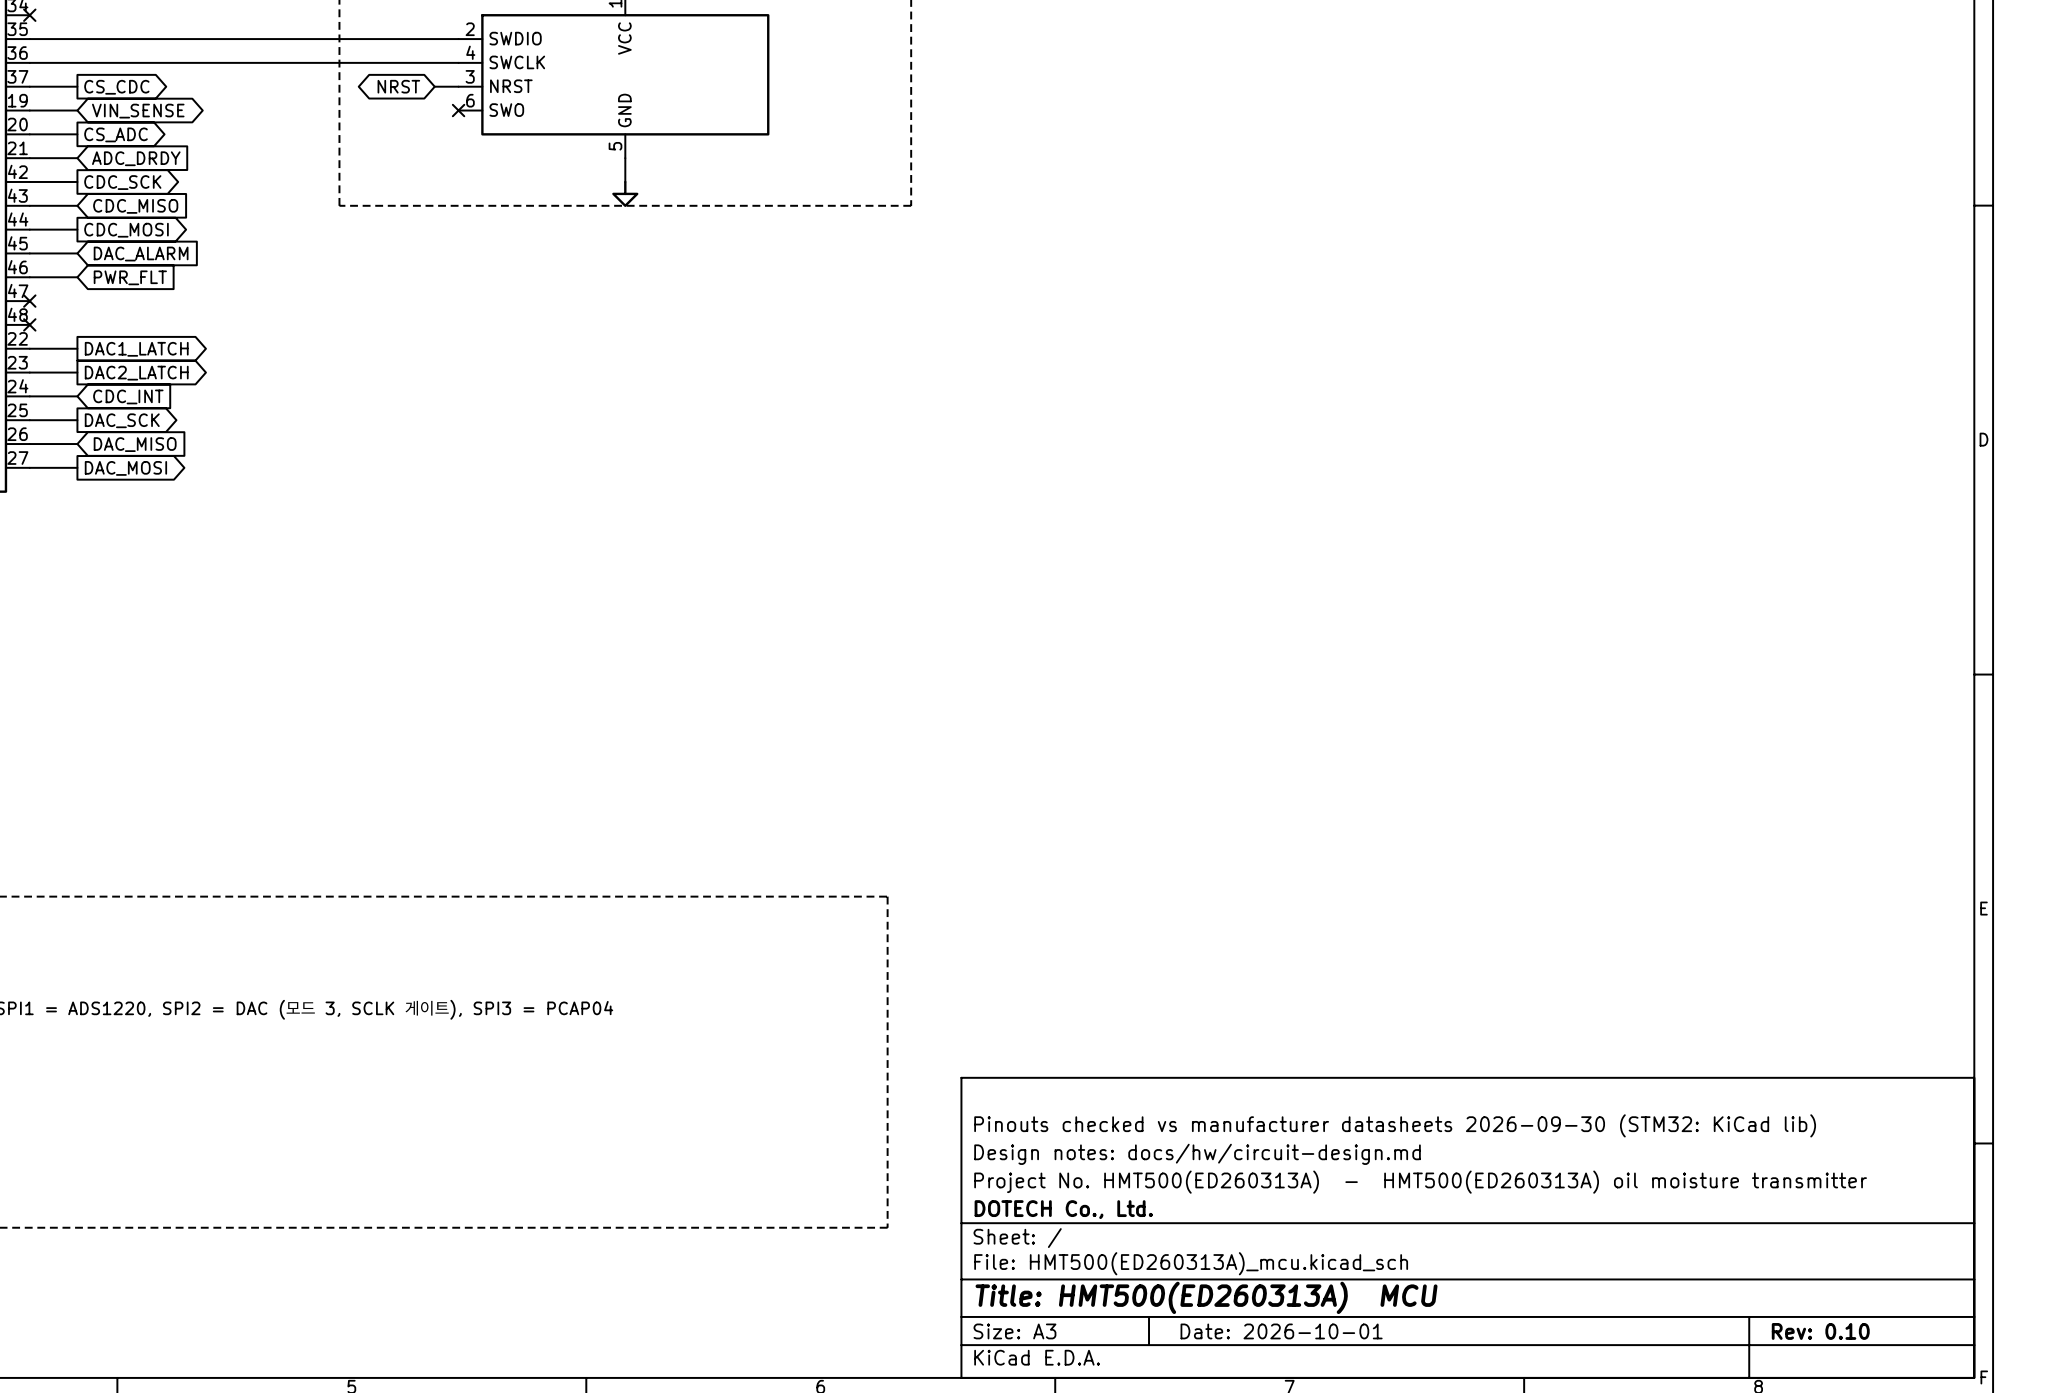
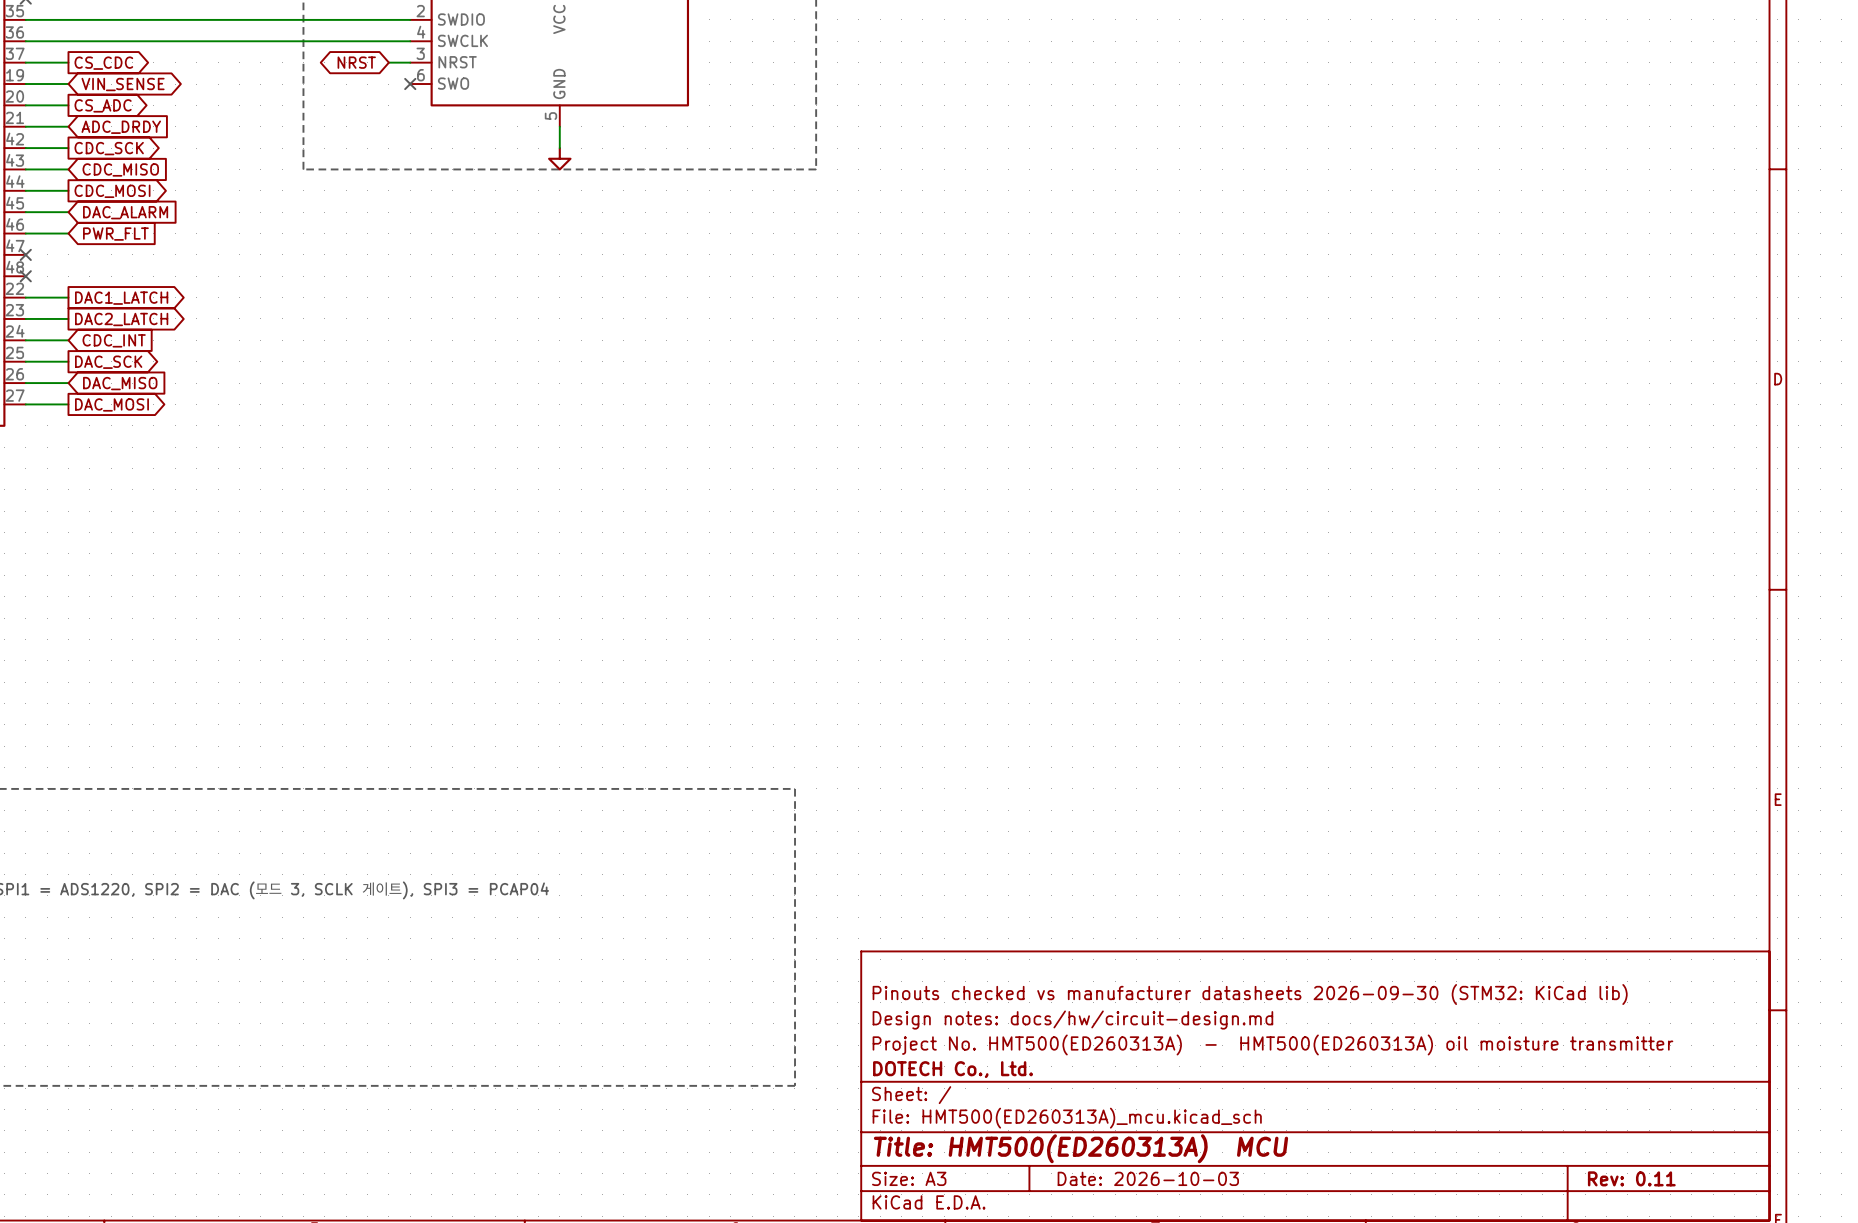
title block: Date: 2026-10-01 (1281, 1331) -> Date: 2026-10-03 (1148, 1178)
title block: Rev: 0.10 (1820, 1331) -> Rev: 0.11 (1631, 1178)

